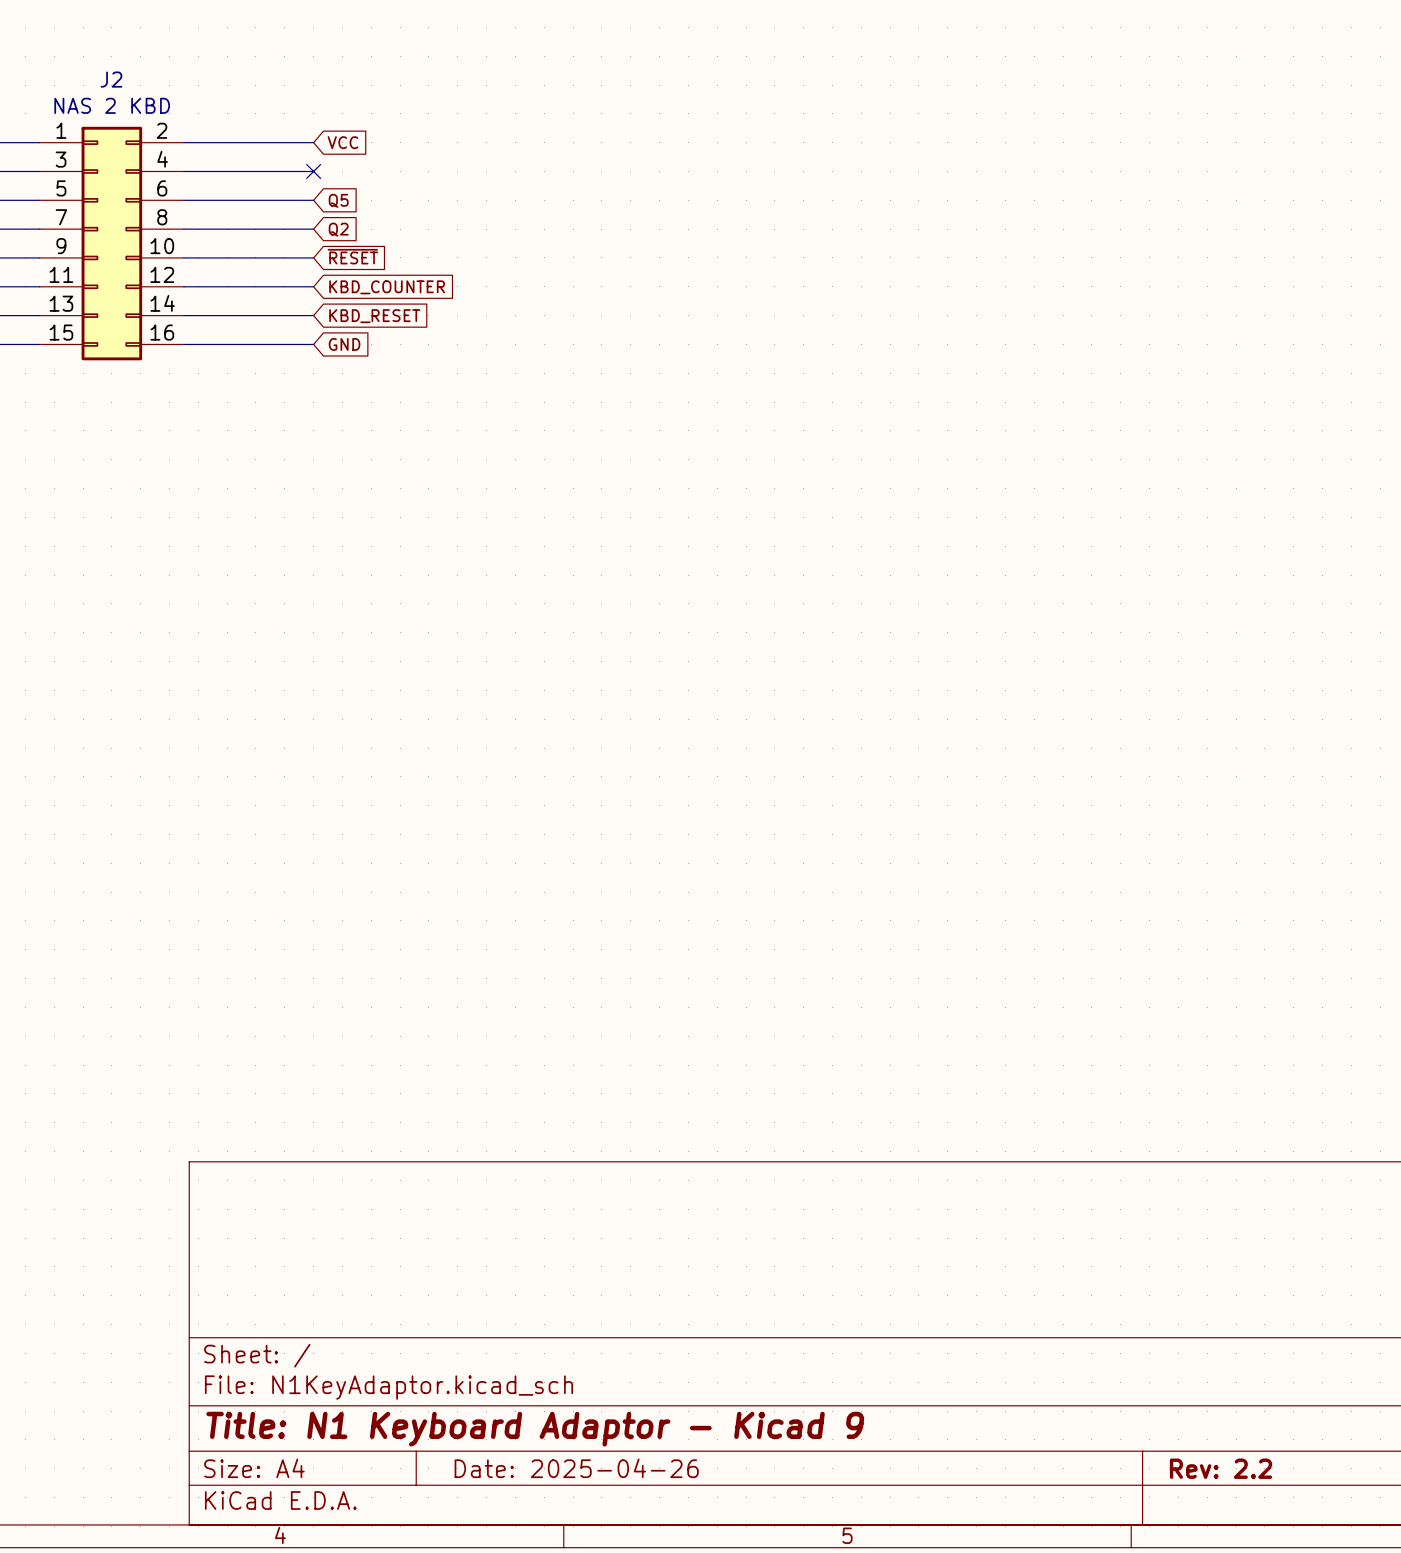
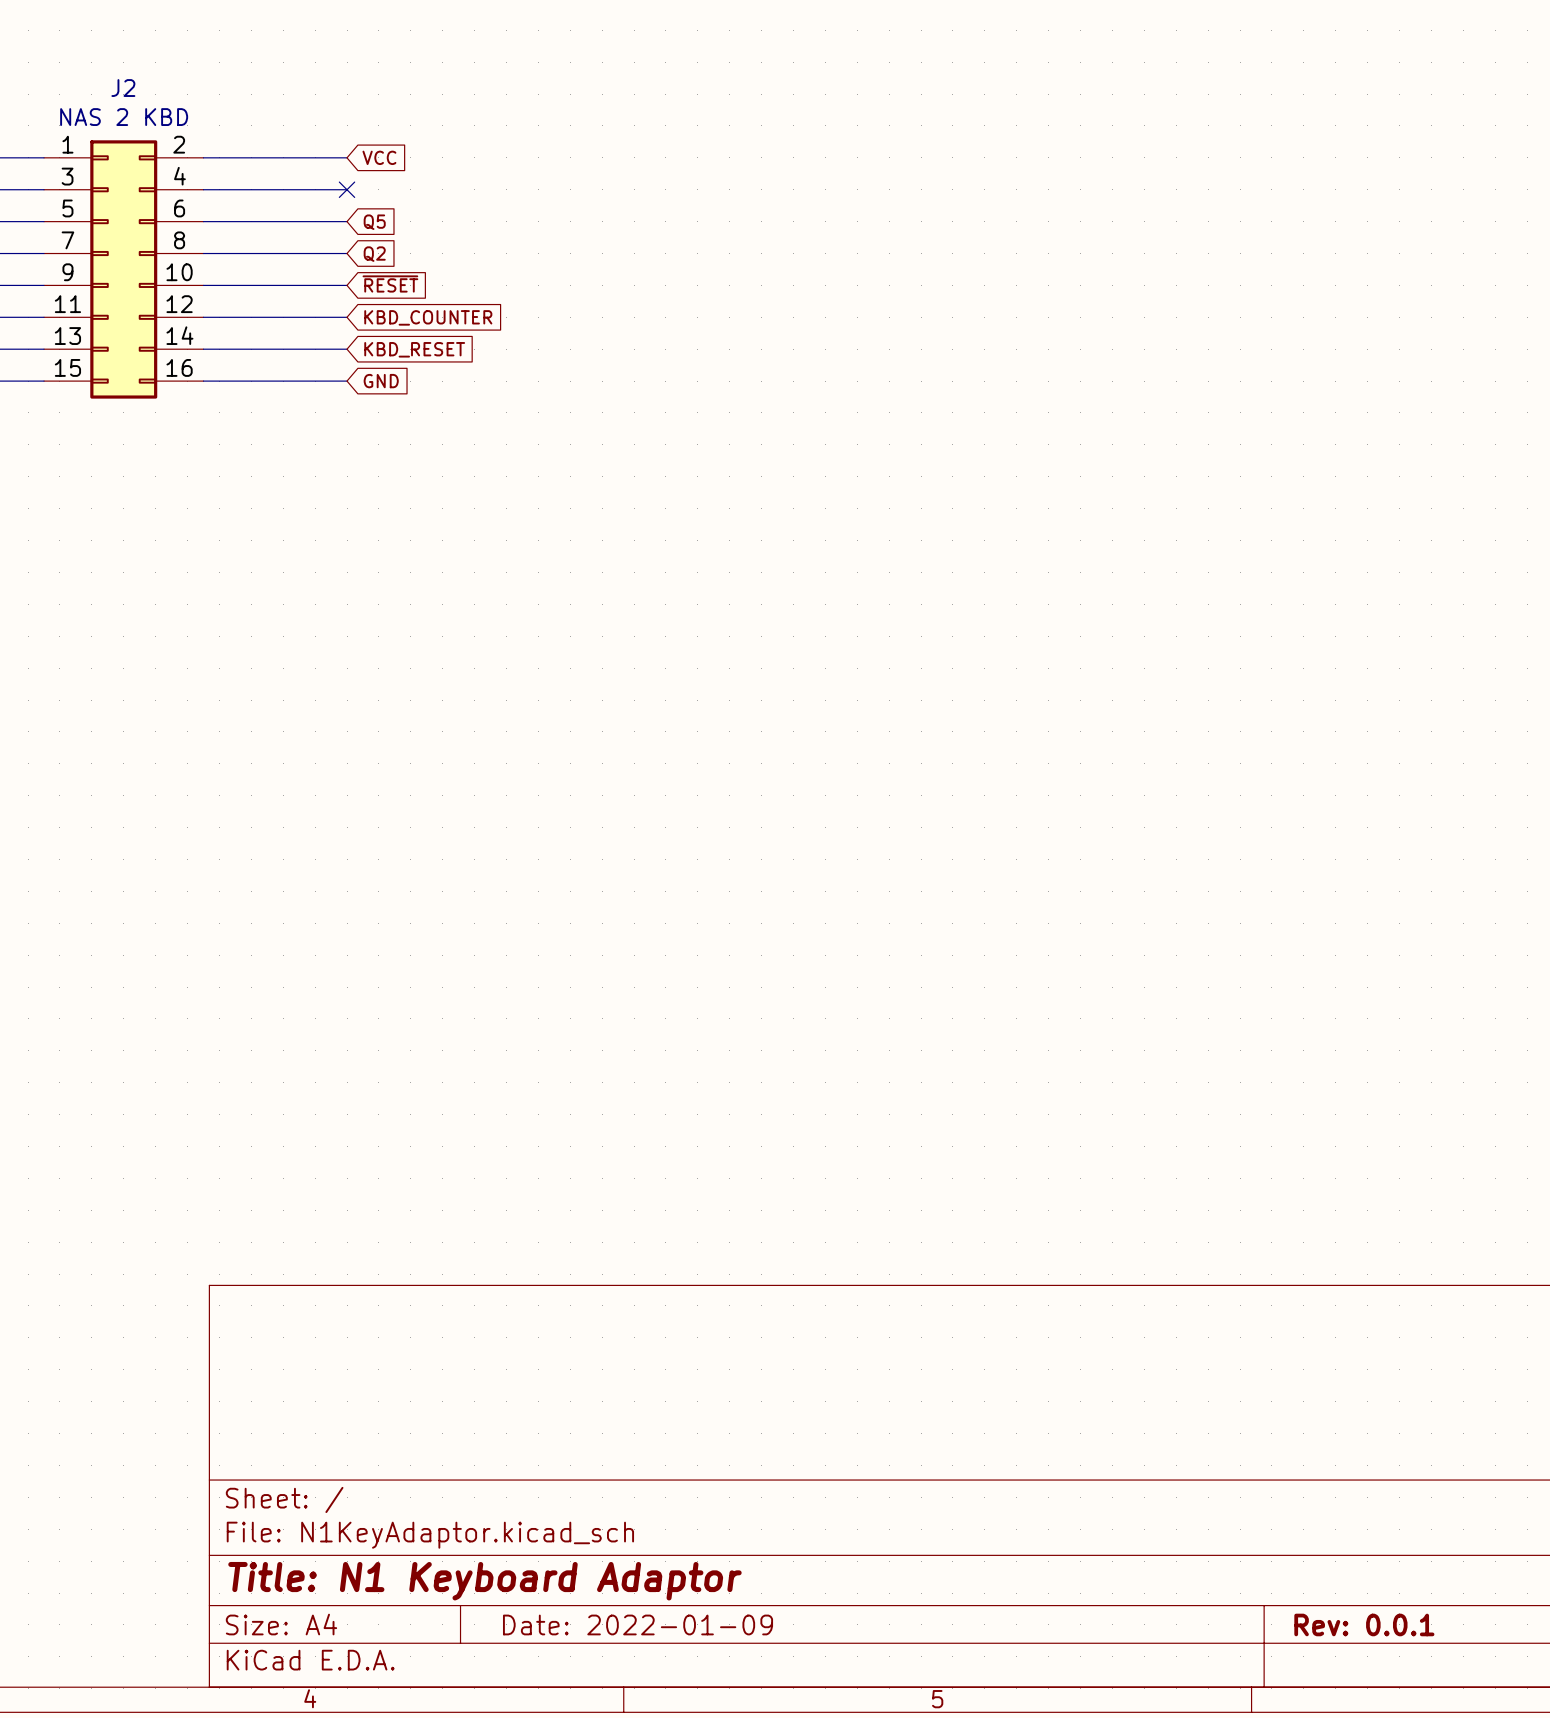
title block: Title: N1 Keyboard Adaptor - Kicad 9 (535, 1429) -> Title: N1 Keyboard Adaptor (484, 1581)
title block: Date: 2025-04-26 (576, 1468) -> Date: 2022-01-09 (638, 1624)
title block: Rev: 2.2 (1221, 1468) -> Rev: 0.0.1 (1364, 1624)

